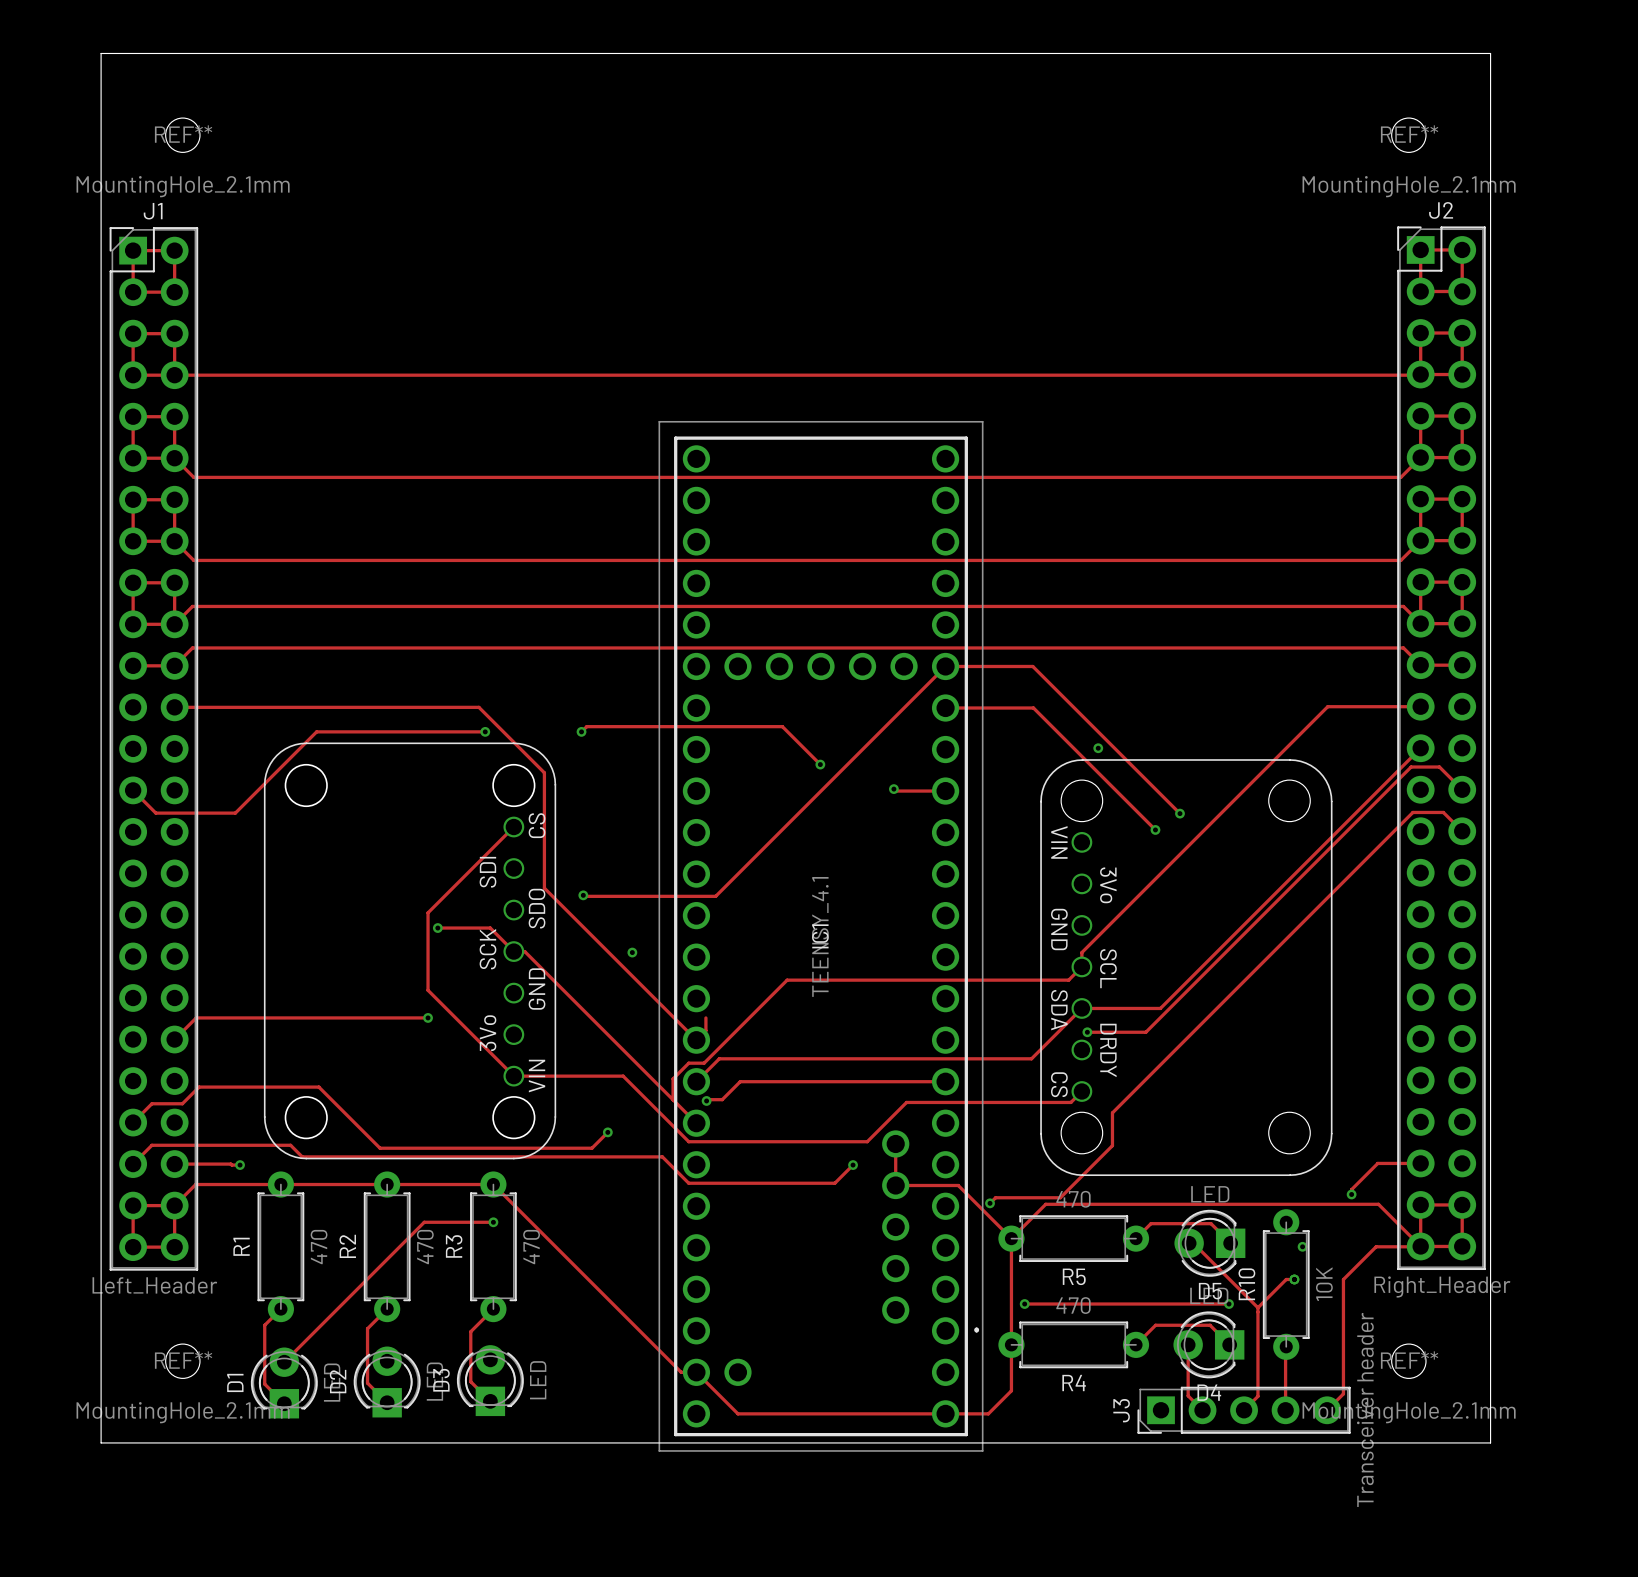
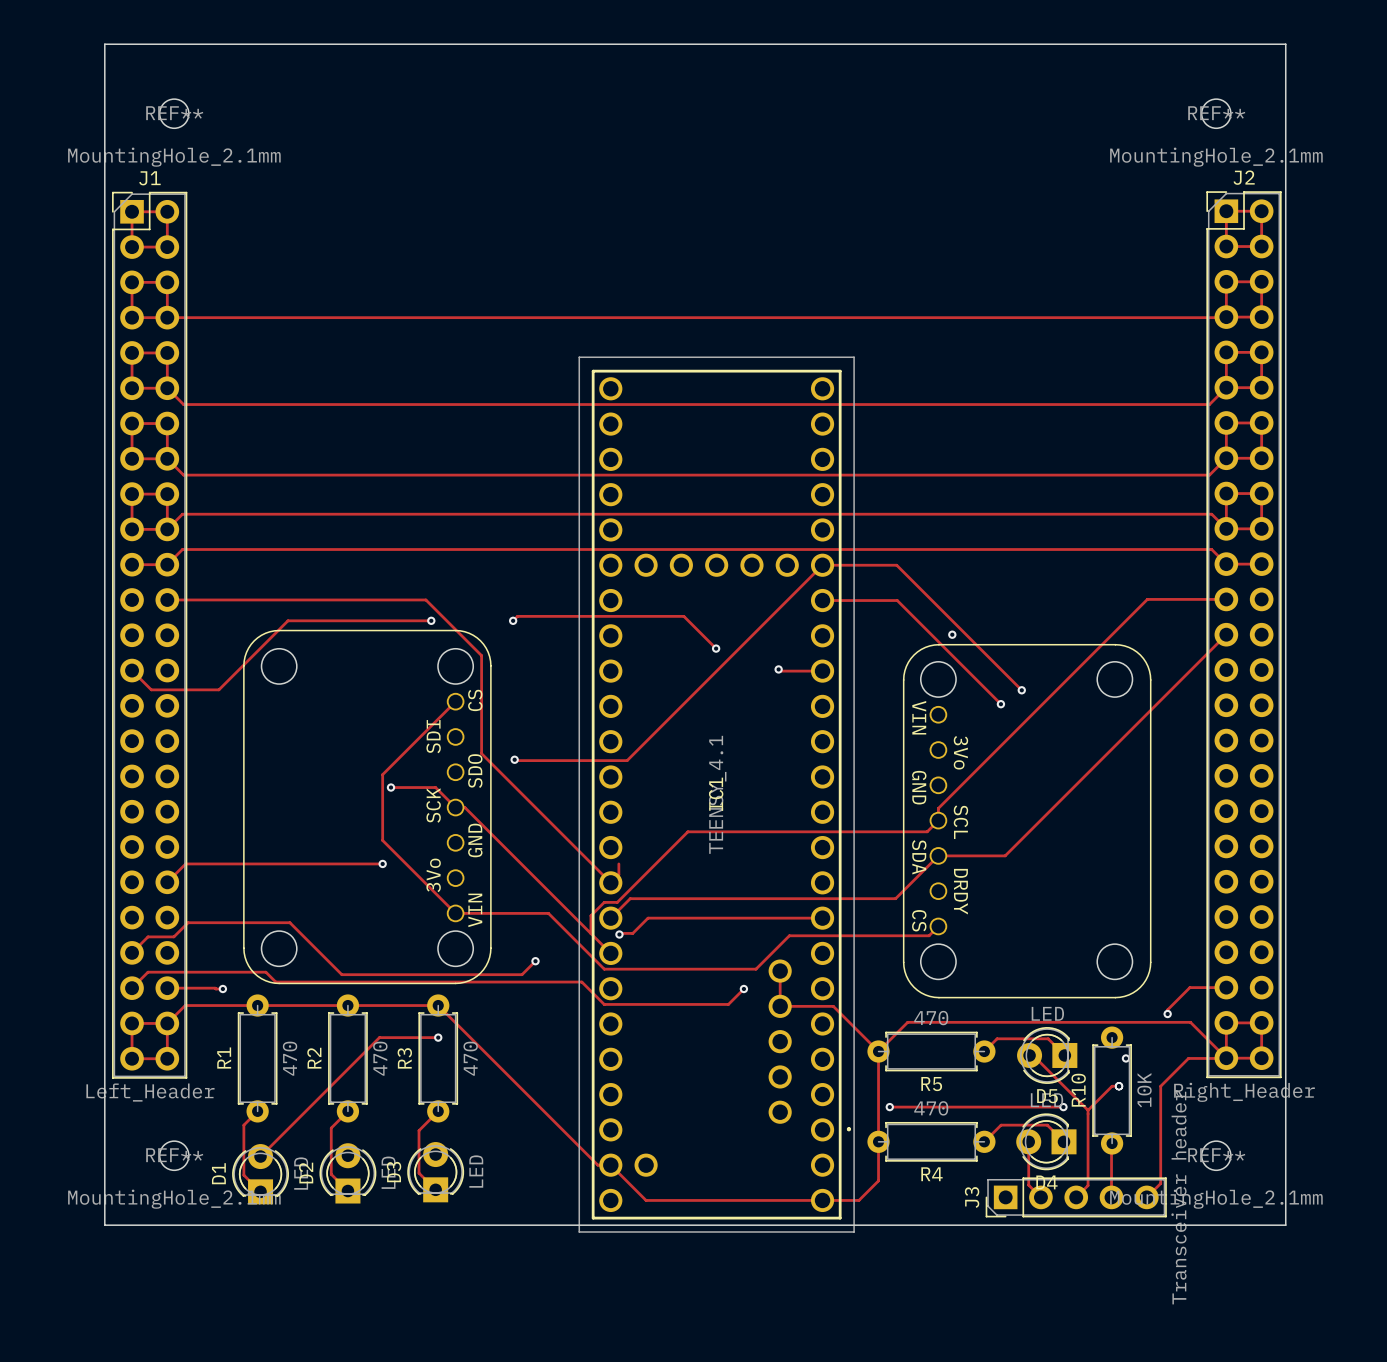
track: (1462, 789) (1439, 767) (1411, 767) (1145, 1032) (1087, 1032) -> none
track: (1462, 831) (1443, 812) (1412, 812) (1112, 1112) (1112, 1145) (1060, 1197) (995, 1197) (990, 1203) -> none
via: (632, 952) -> none
via: (1087, 1032) -> none
via: (990, 1203) -> none

